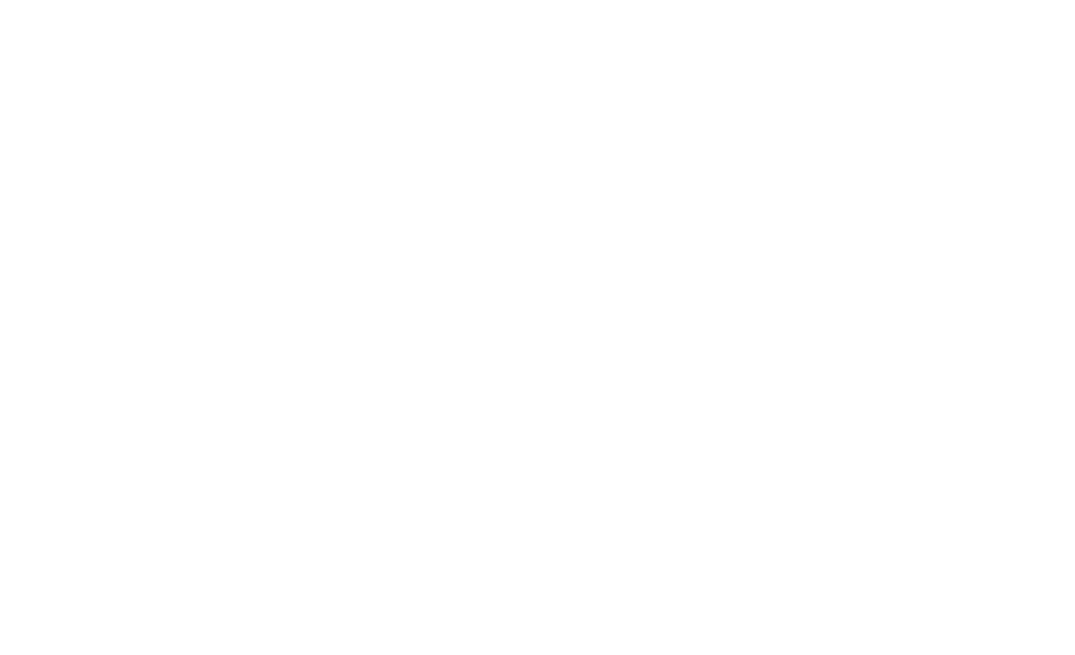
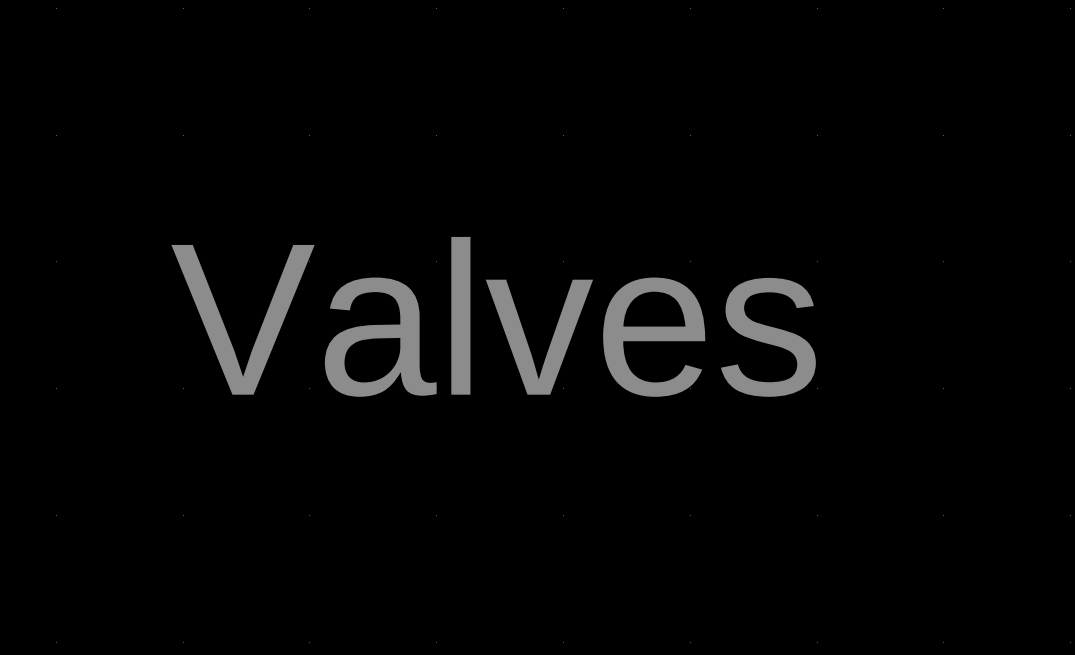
text: none -> Valves (493, 316)

